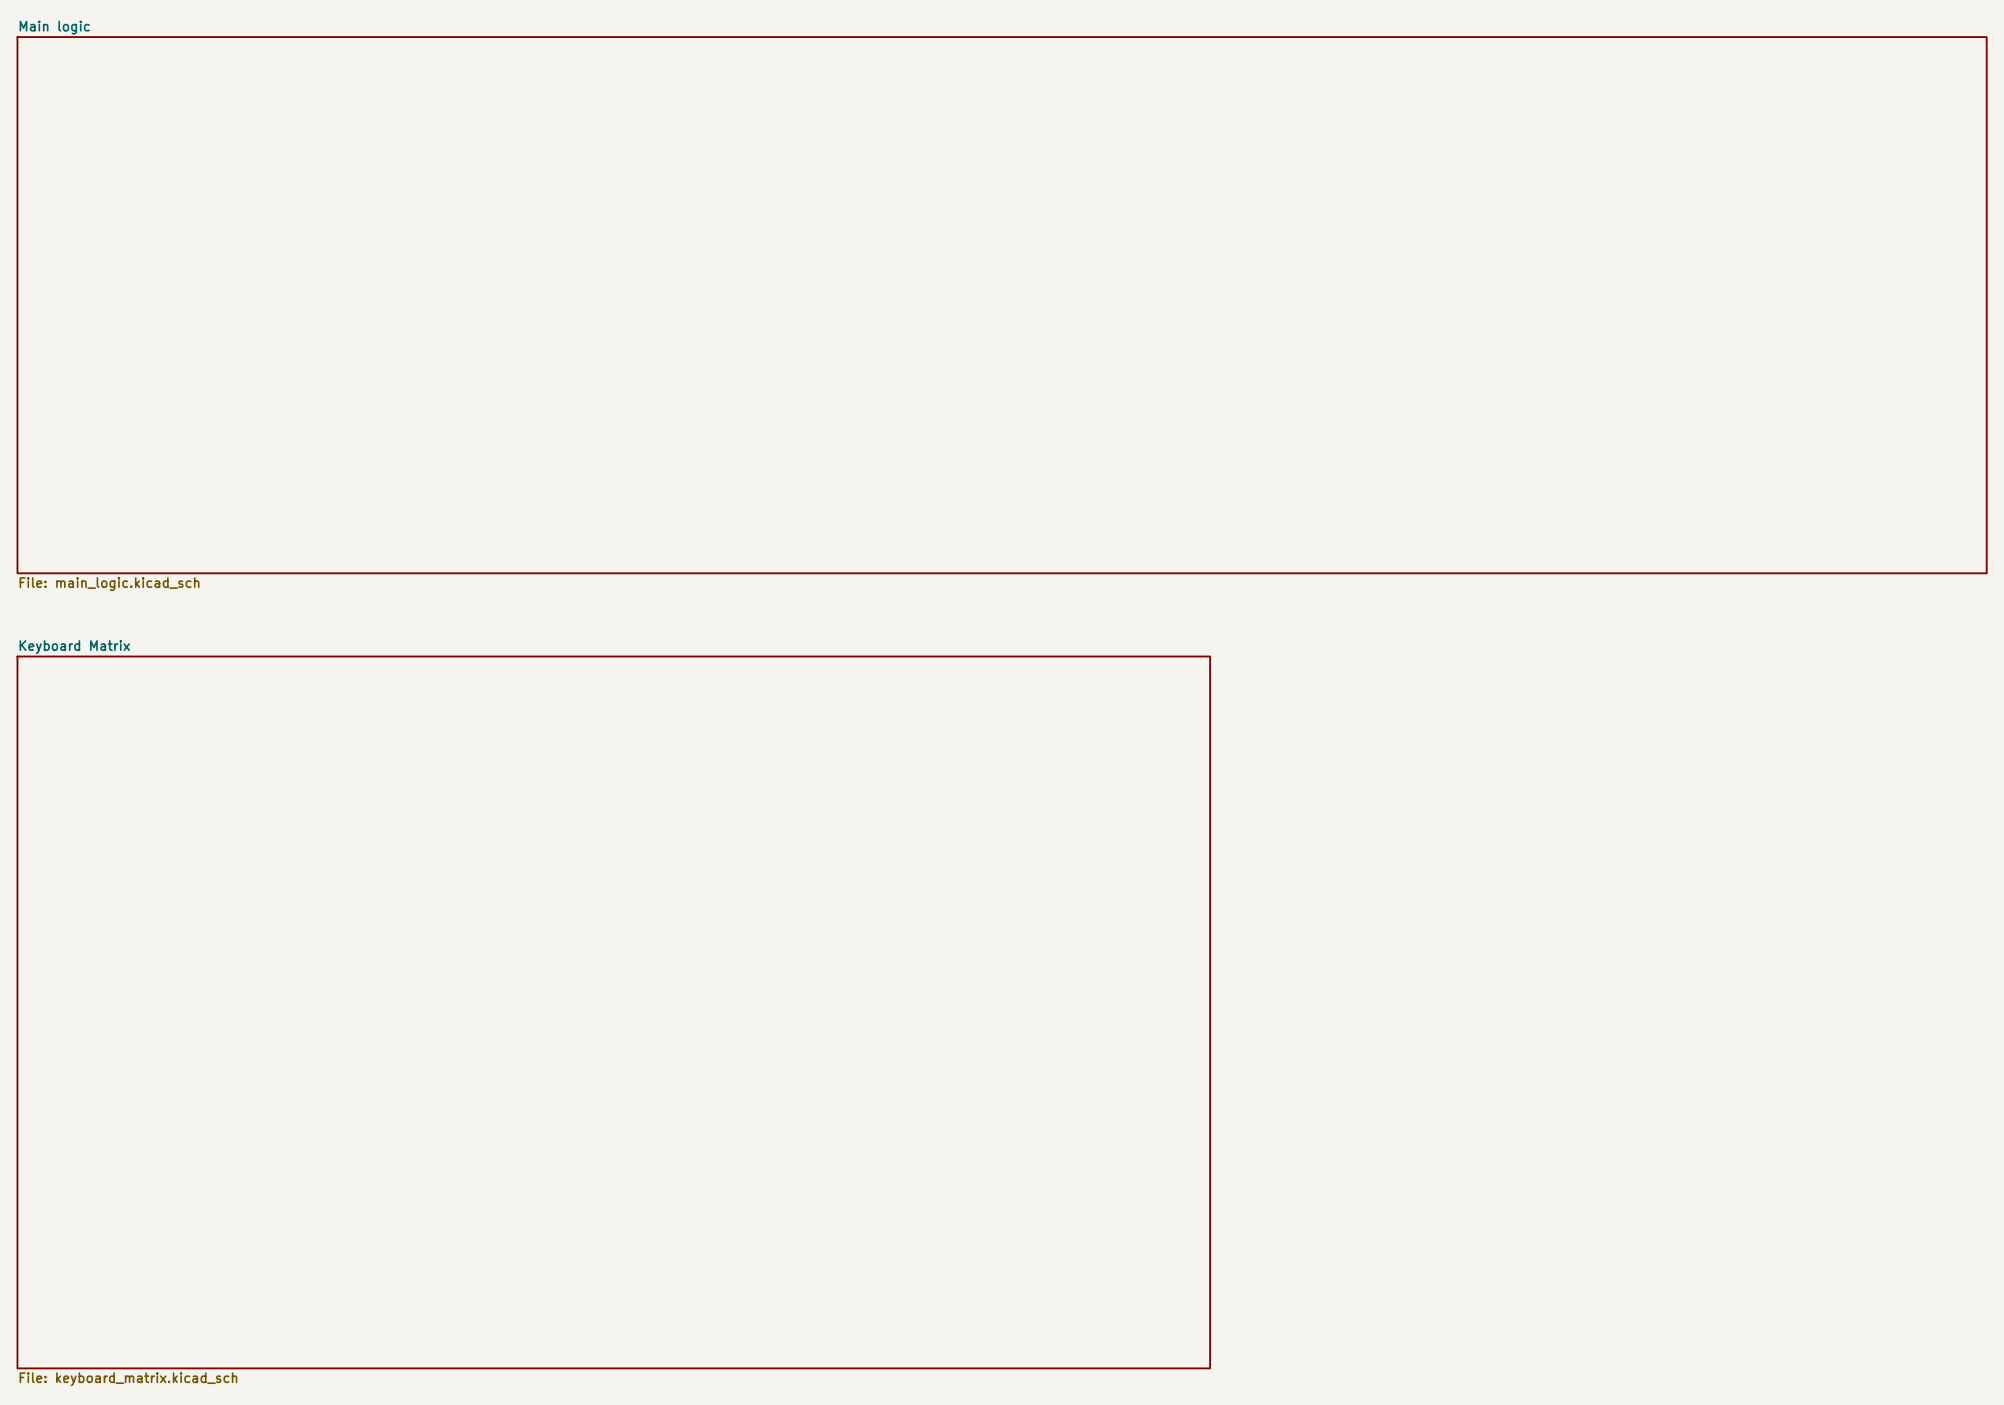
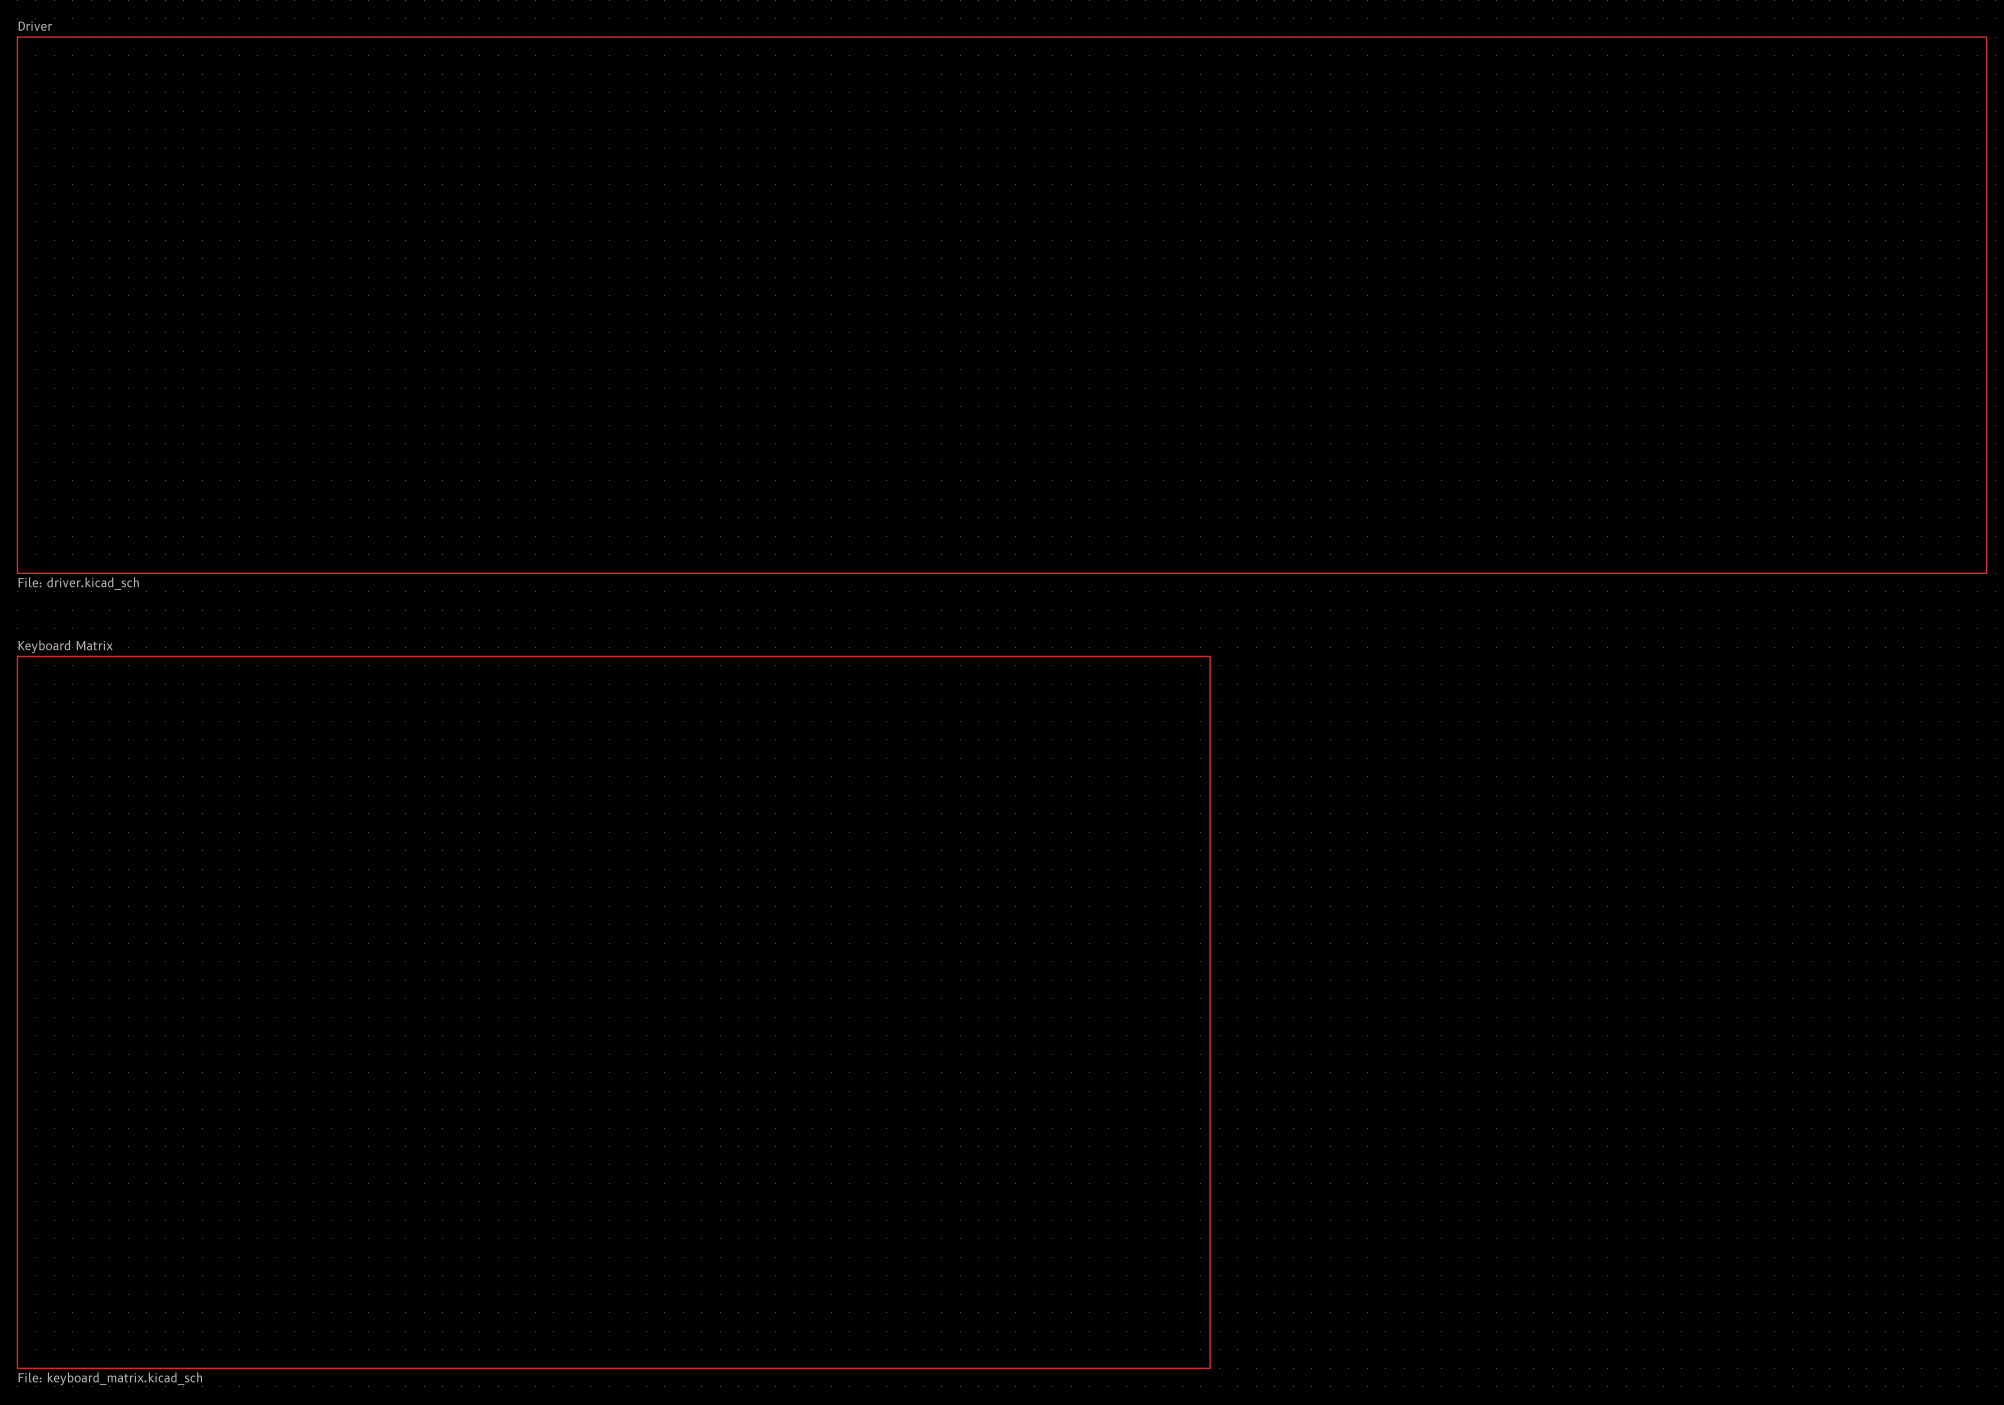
sheet Main logic name: Main logic (54, 27) -> Driver (35, 26)
sheet Main logic value: File: main_logic.kicad_sch (109, 584) -> File: driver.kicad_sch (78, 583)

